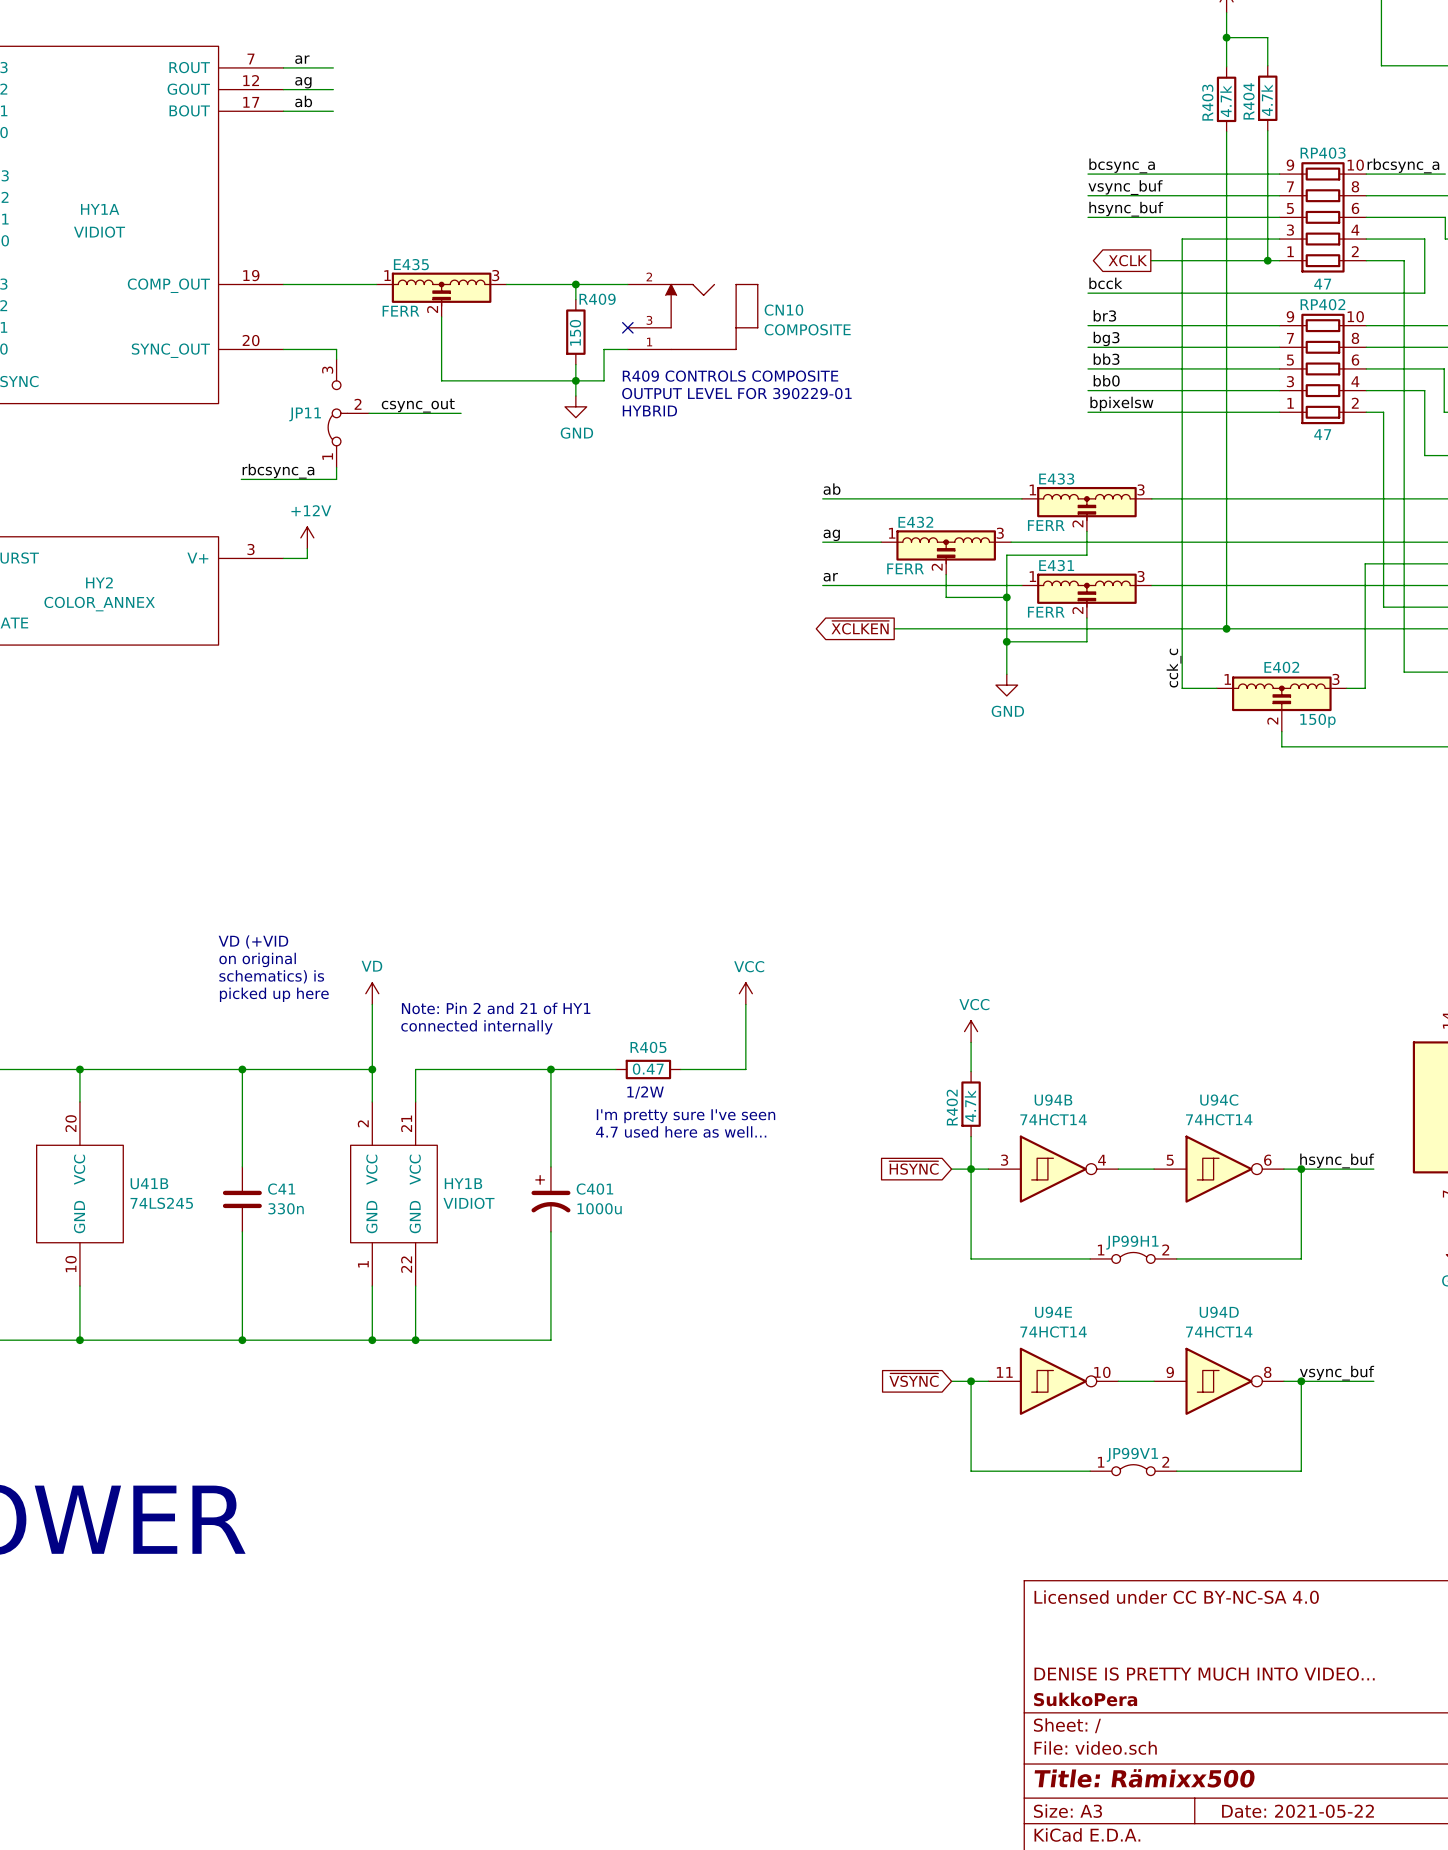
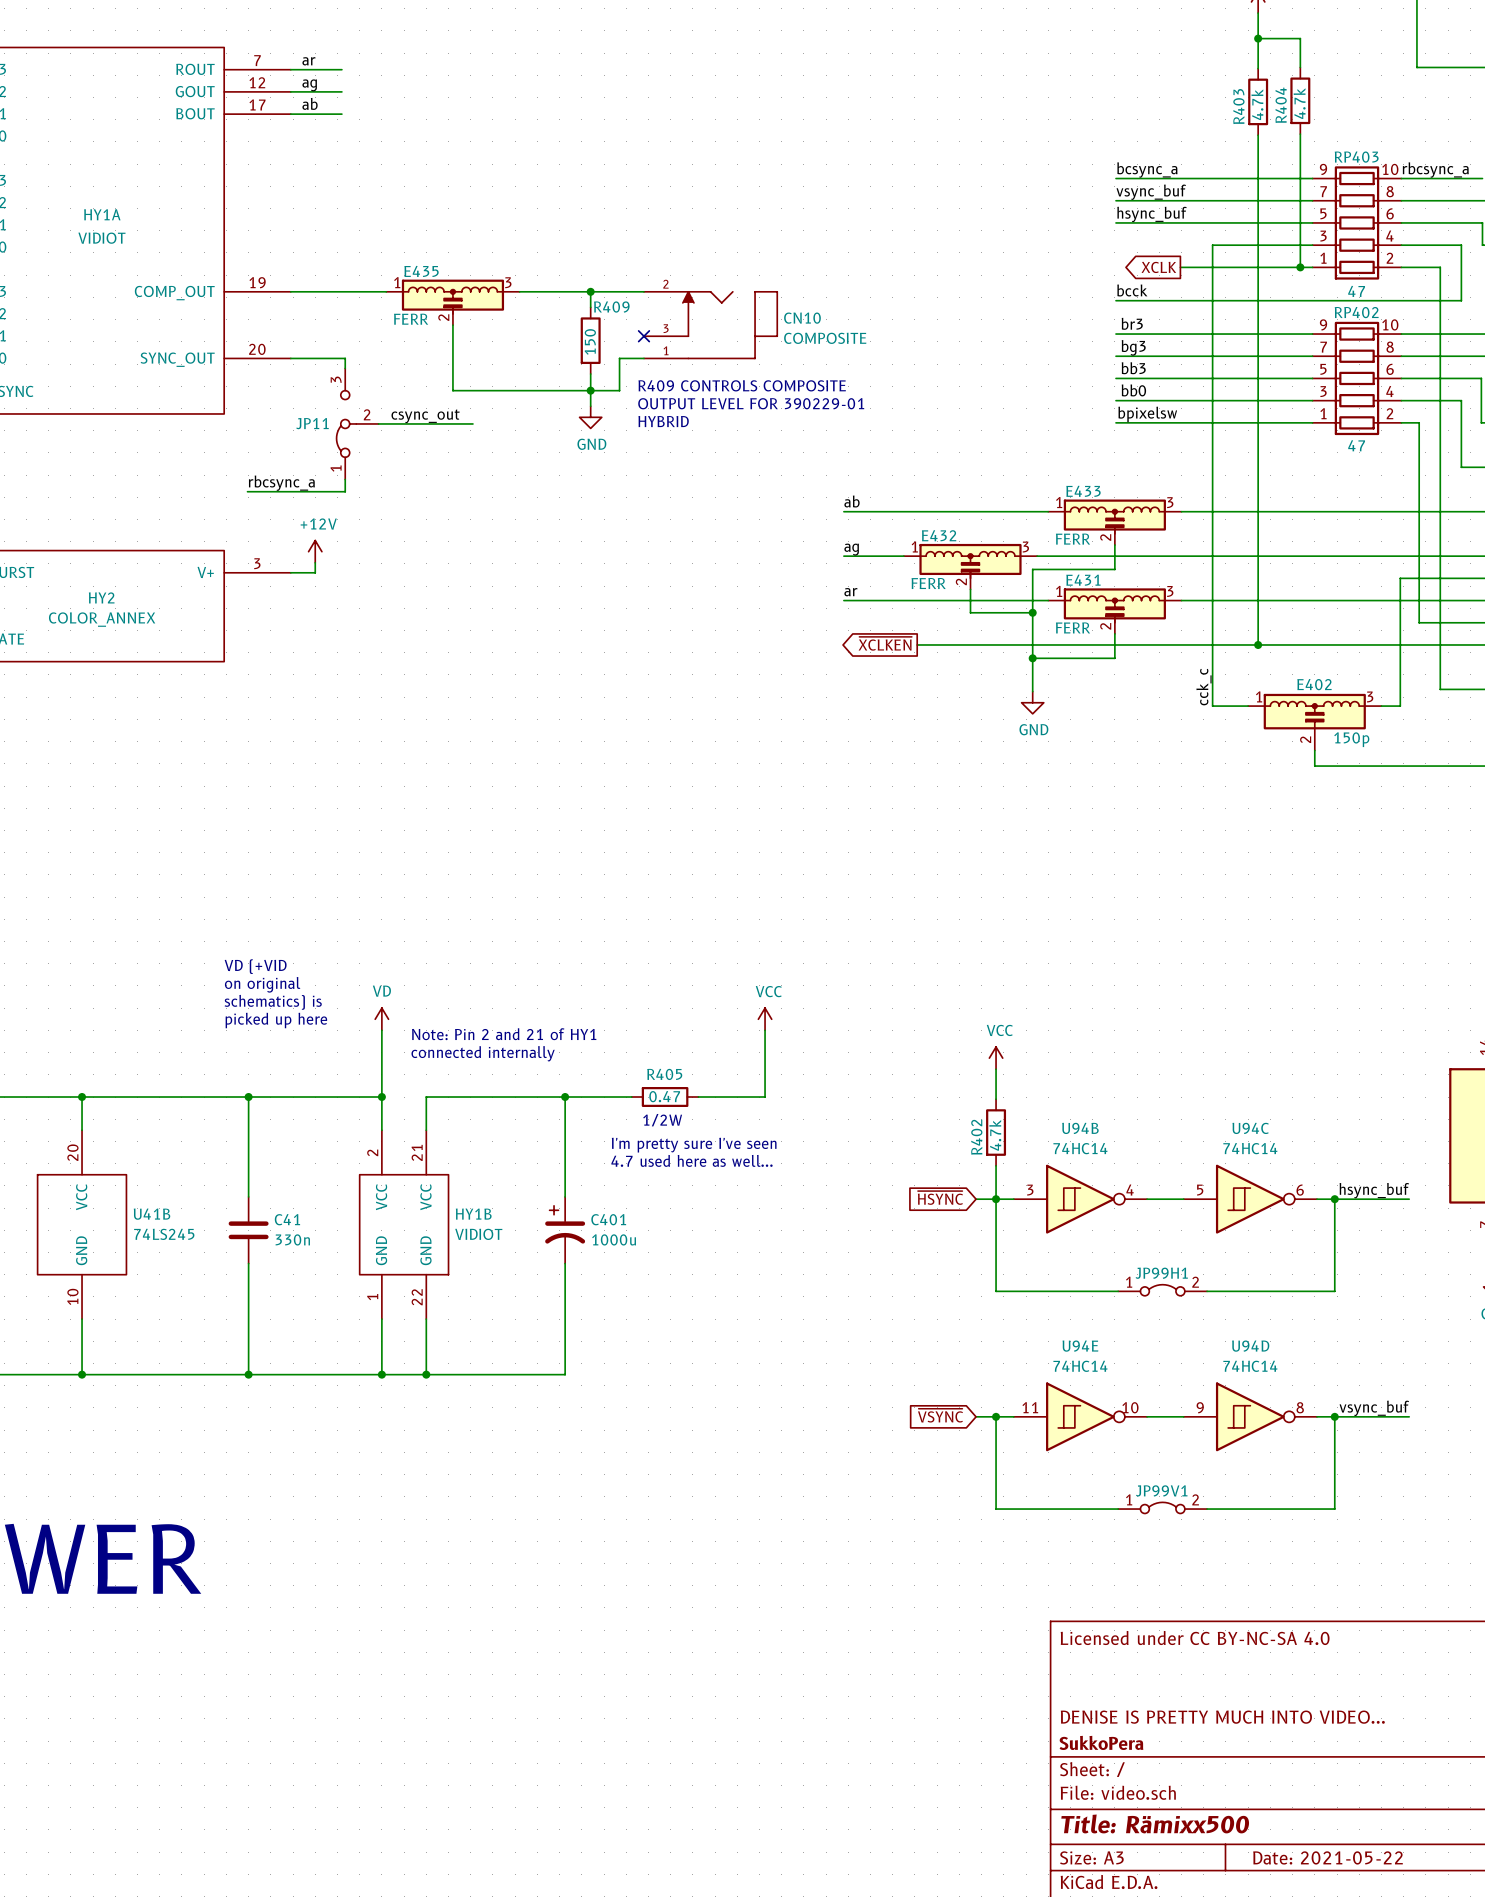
U94B value: 74HCT14 (1053, 1119) -> 74HC14 (1080, 1148)
U94C value: 74HCT14 (1219, 1119) -> 74HC14 (1250, 1148)
U94E value: 74HCT14 (1053, 1331) -> 74HC14 (1080, 1366)
U94D value: 74HCT14 (1219, 1331) -> 74HC14 (1250, 1366)

